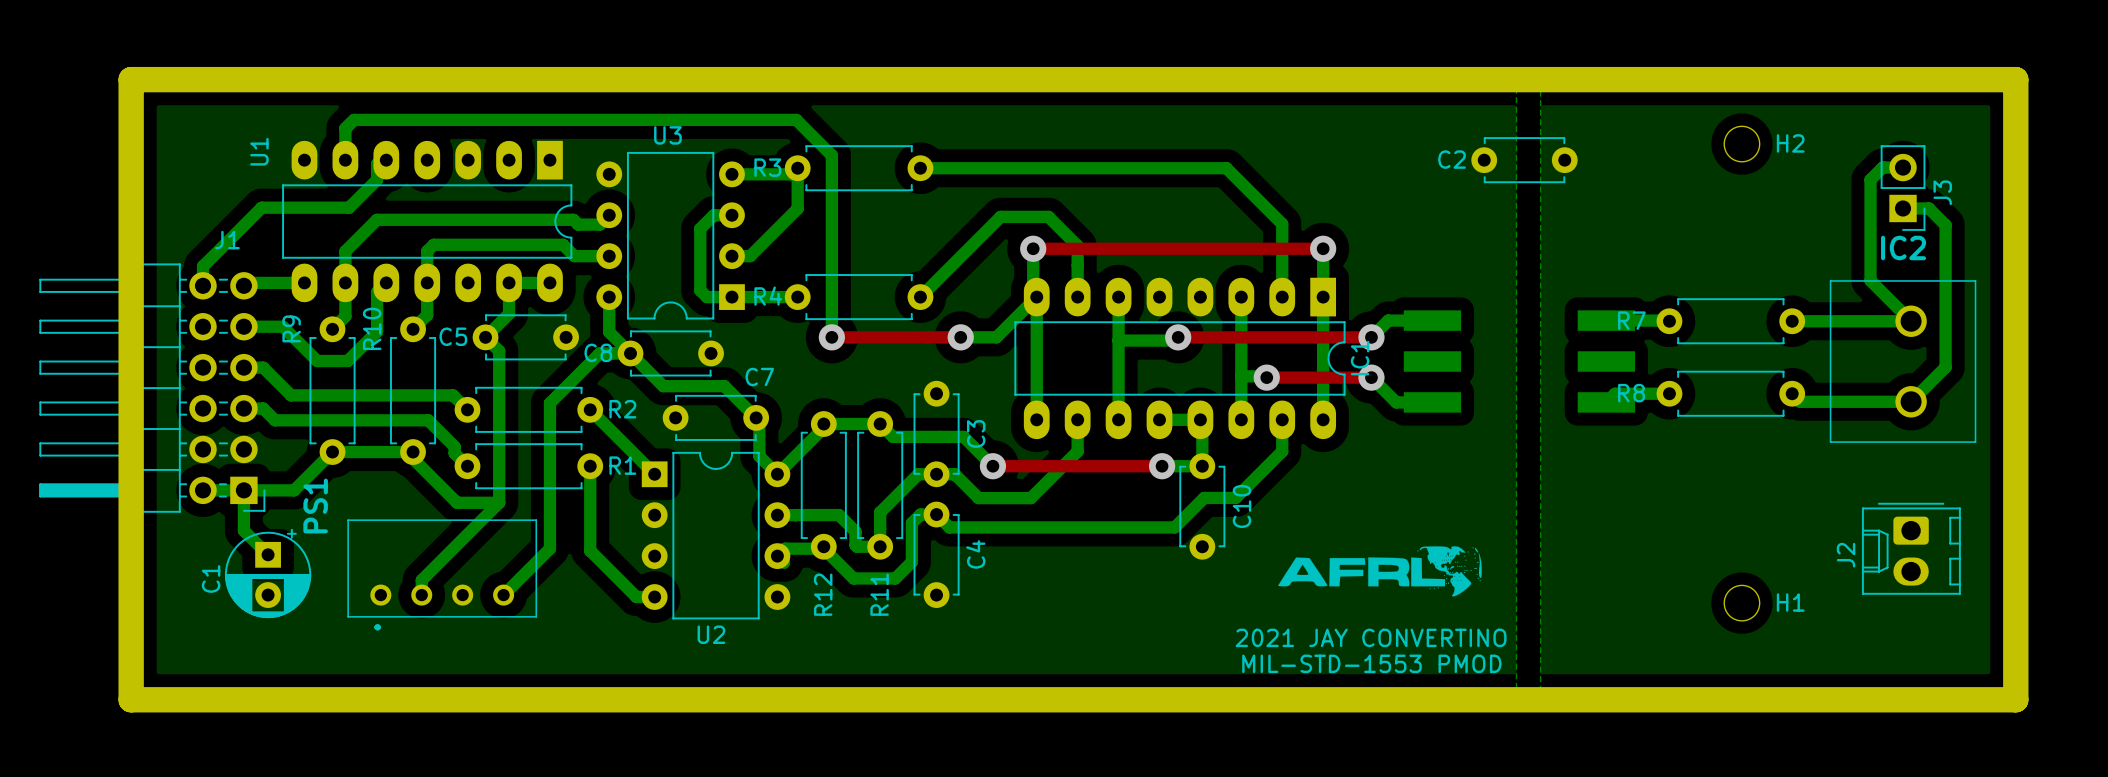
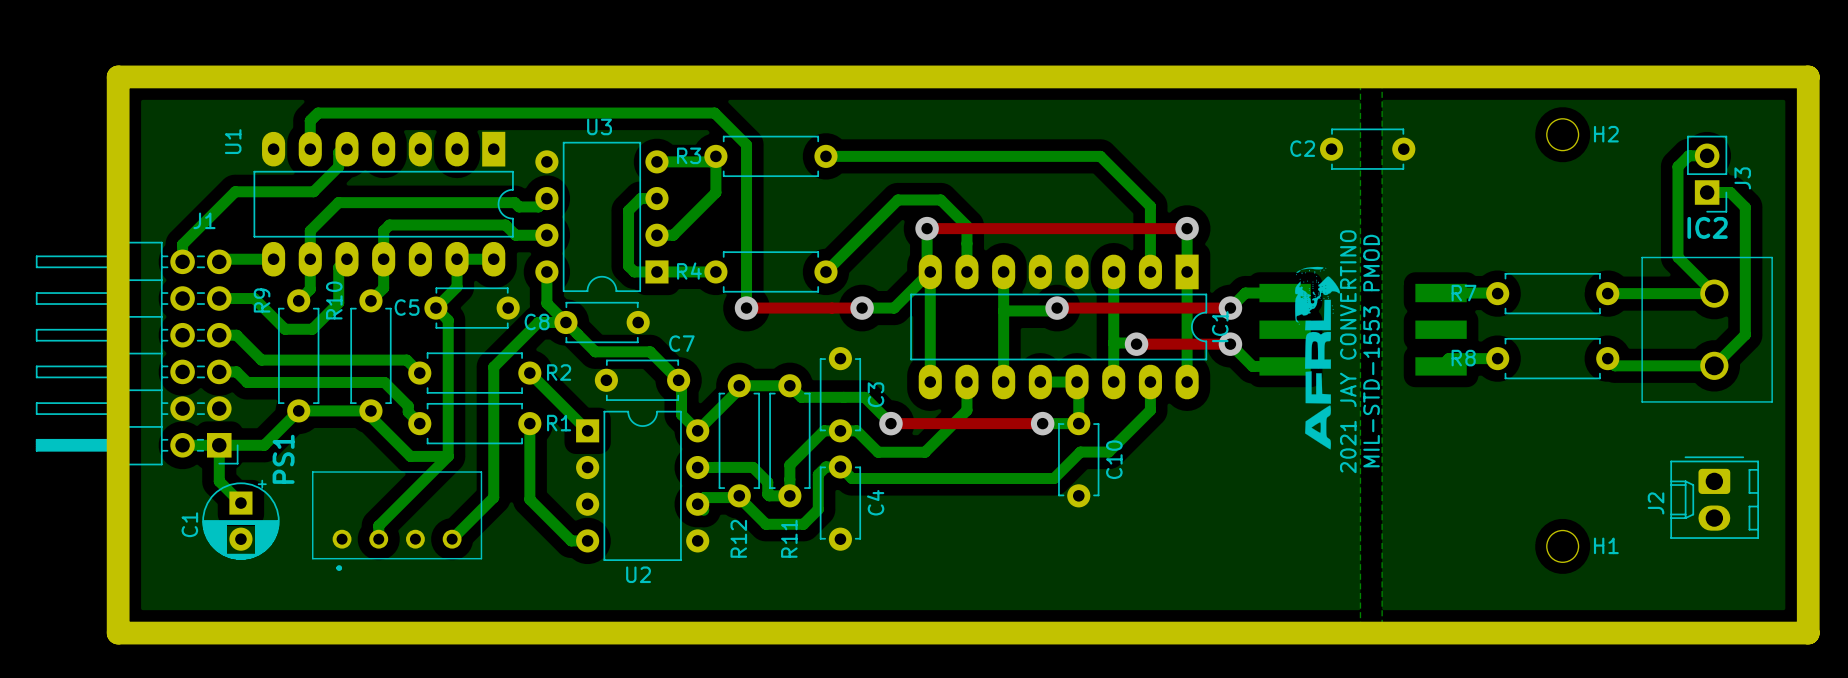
drawing: none -> [1295, 266, 1340, 450]
drawing: [1278, 546, 1482, 597] -> none
text rotation: 0° (1371, 637) -> 90° counterclockwise (1348, 351)
text rotation: 0° (1371, 663) -> 90° counterclockwise (1371, 351)
text position: MIL-STD-1553 PMOD (1371, 663) -> MIL-STD-1553 PMOD (1371, 351)

